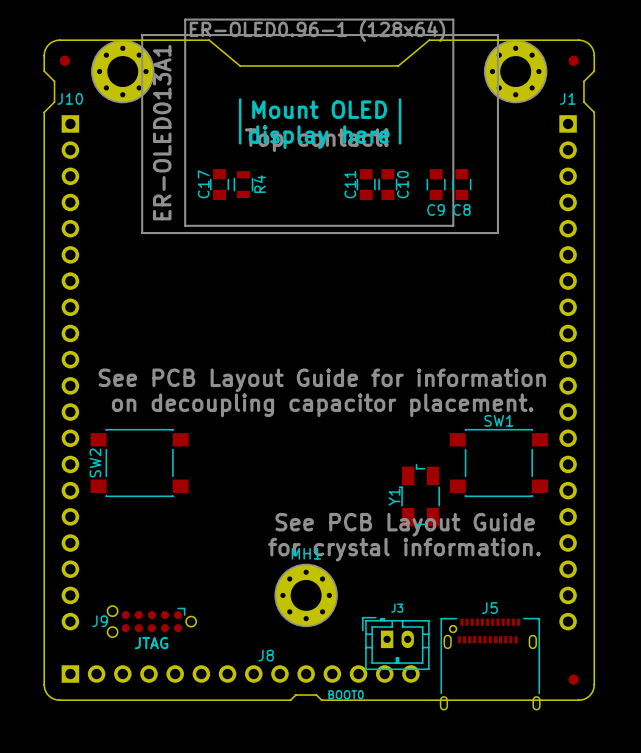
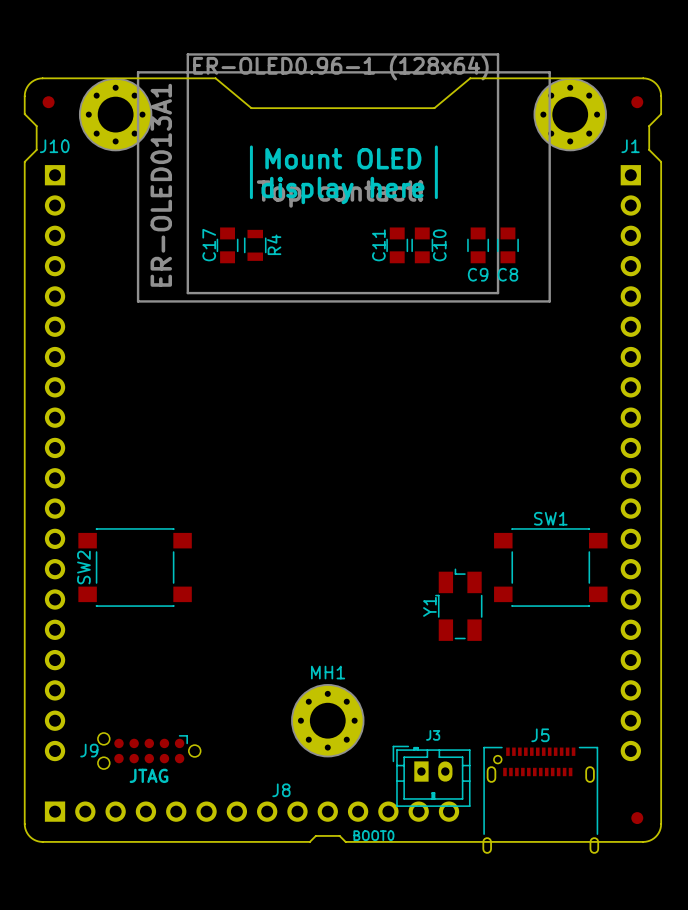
text: See PCB Layout Guide for information (322, 380) -> none
text: on decoupling capacitor placement. (322, 405) -> none
text: See PCB Layout Guide (405, 524) -> none
text: for crystal information. (404, 549) -> none

